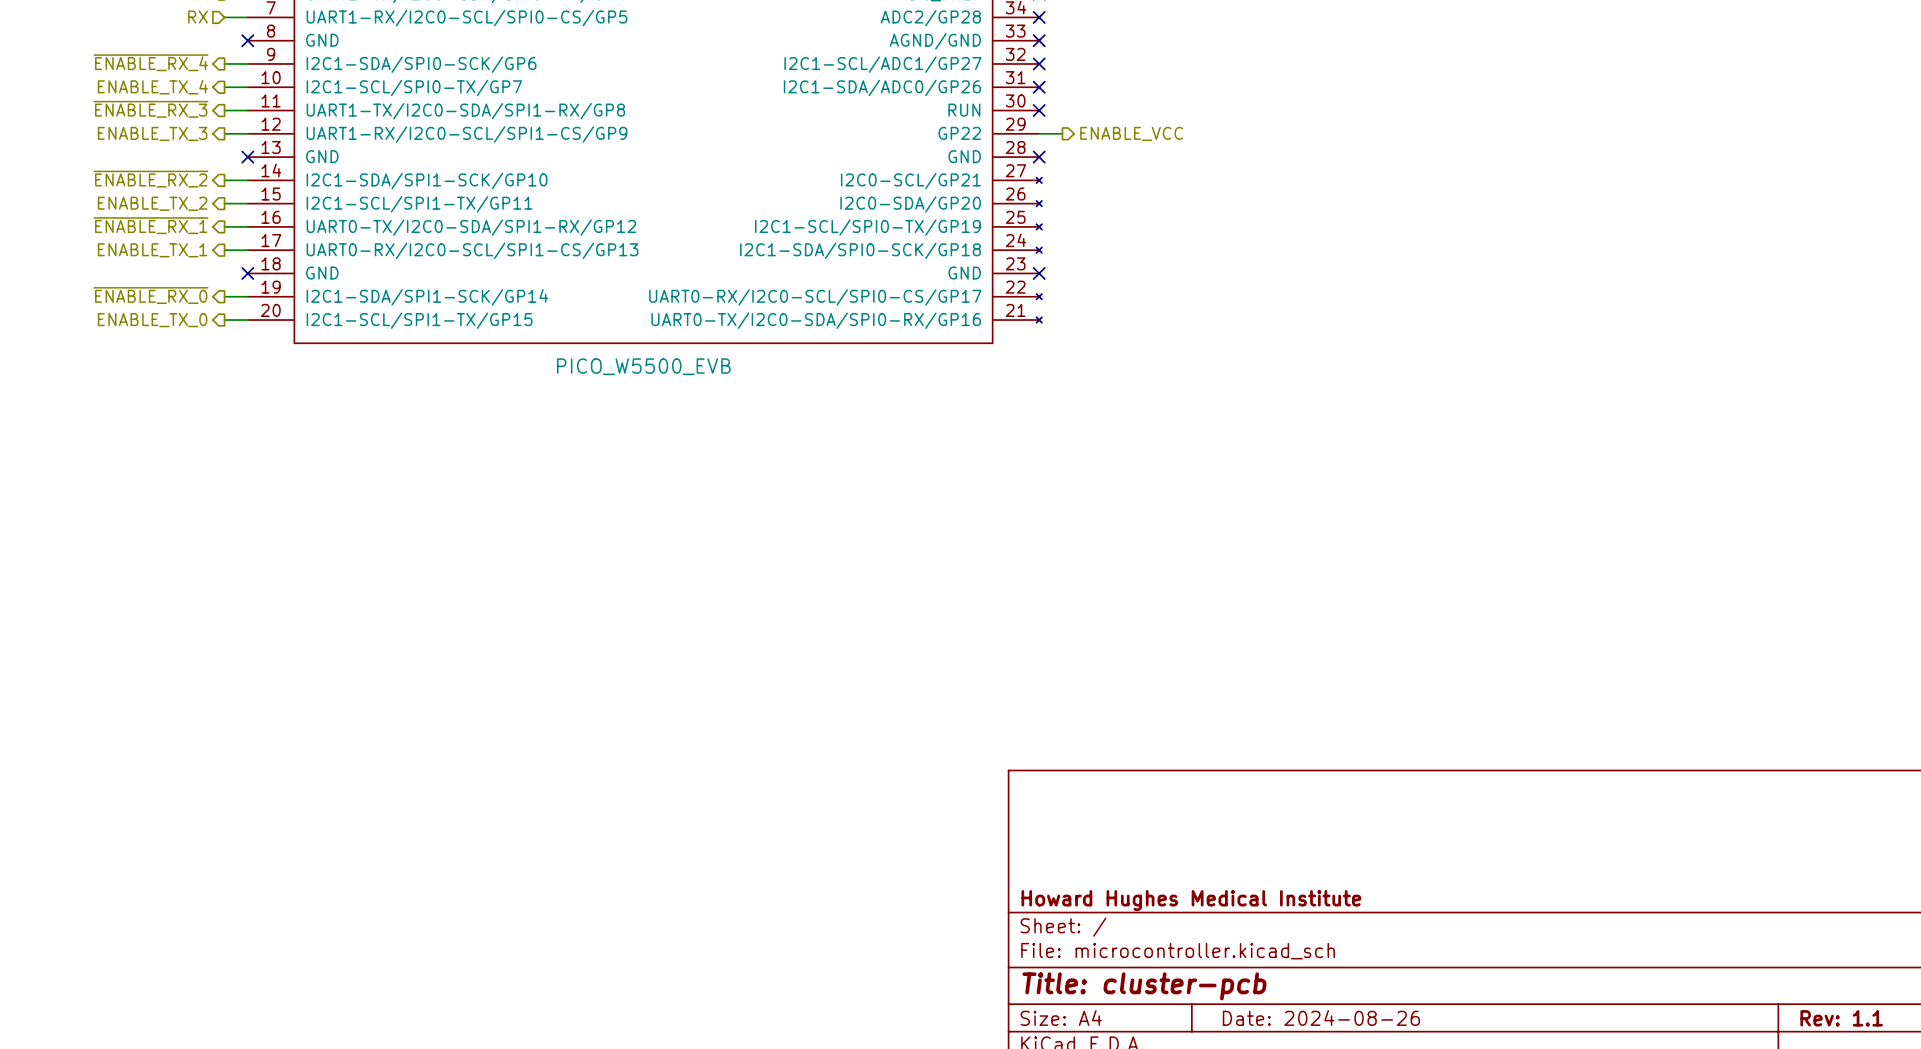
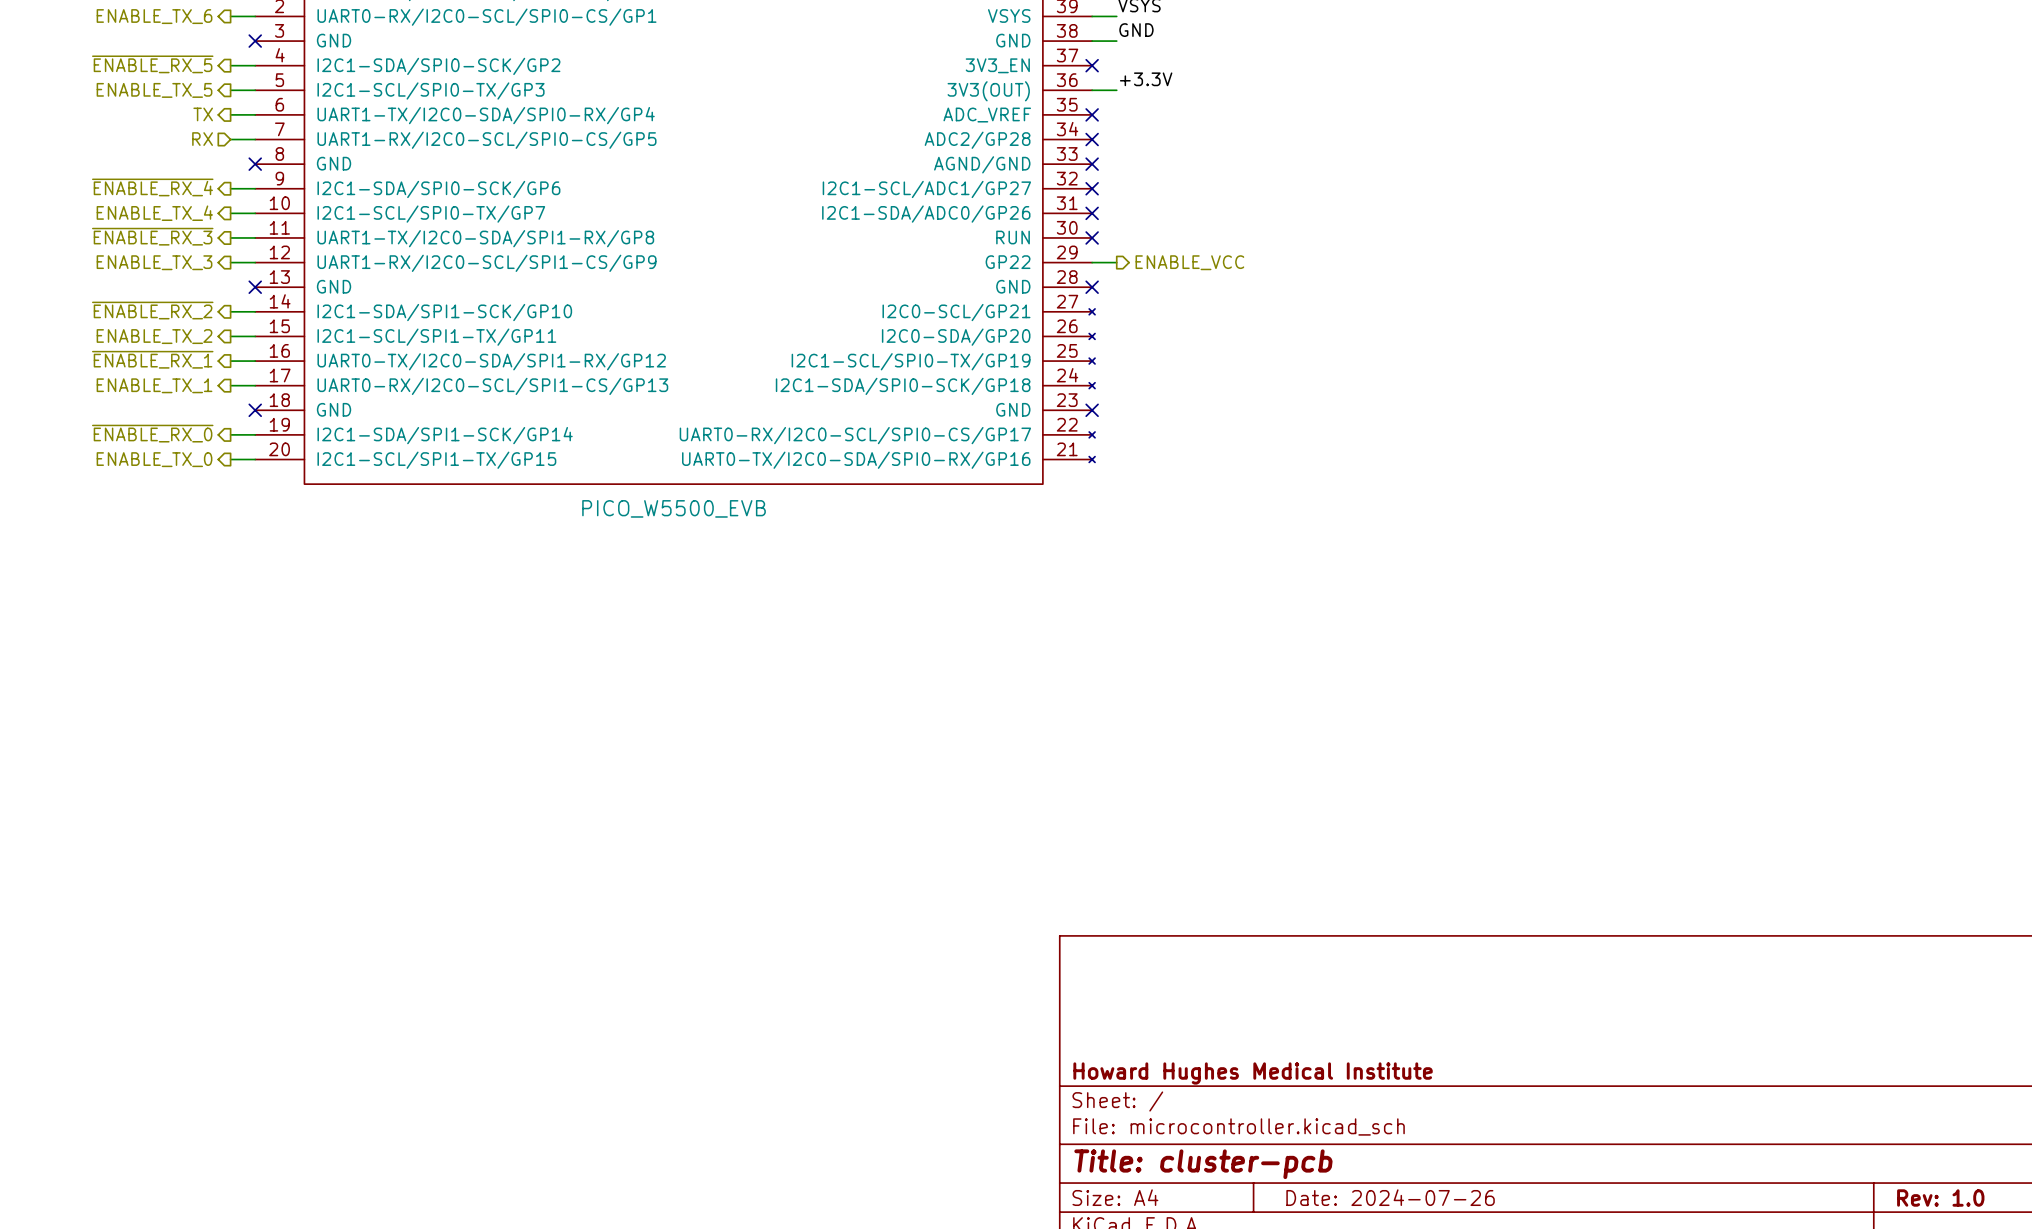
title block: Date: 2024-08-26 (1321, 1017) -> Date: 2024-07-26 (1390, 1197)
title block: Rev: 1.1 (1841, 1018) -> Rev: 1.0 (1940, 1197)

